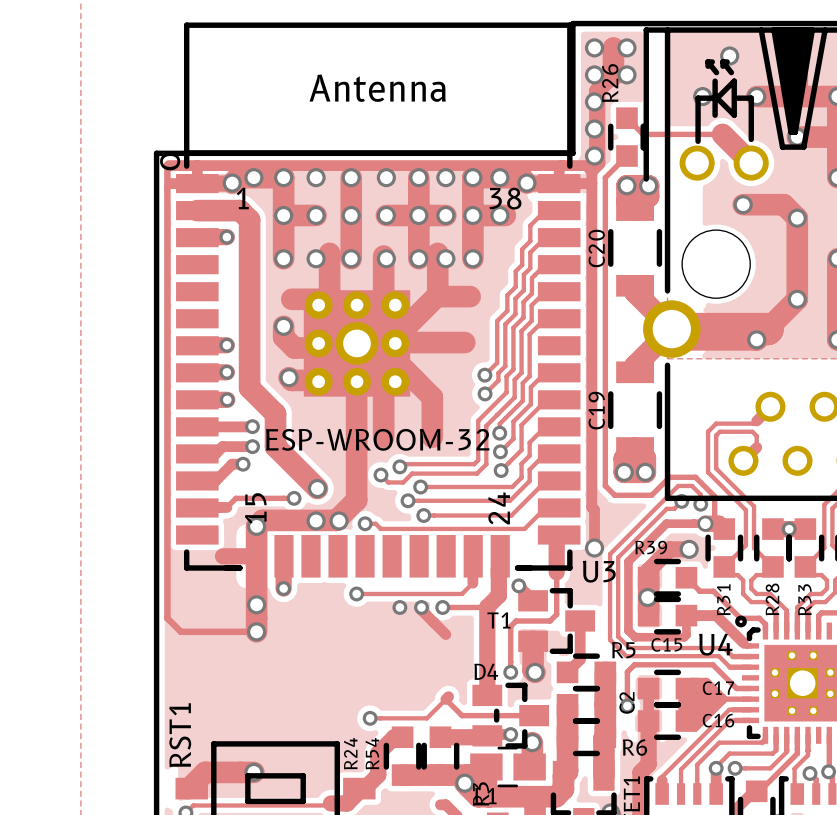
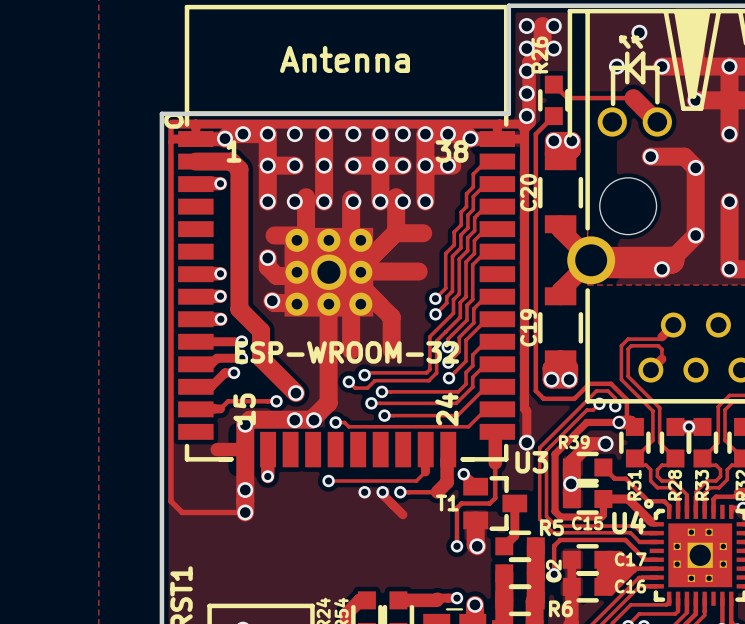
track: (487, 607) (487, 695) -> none
track: (448, 696) (445, 699) -> none
track: (445, 699) (462, 715) (534, 715) -> none
track: (445, 699) (426, 718) (370, 718) -> none
D4: (510, 715) -> none
via: (370, 718) -> none

